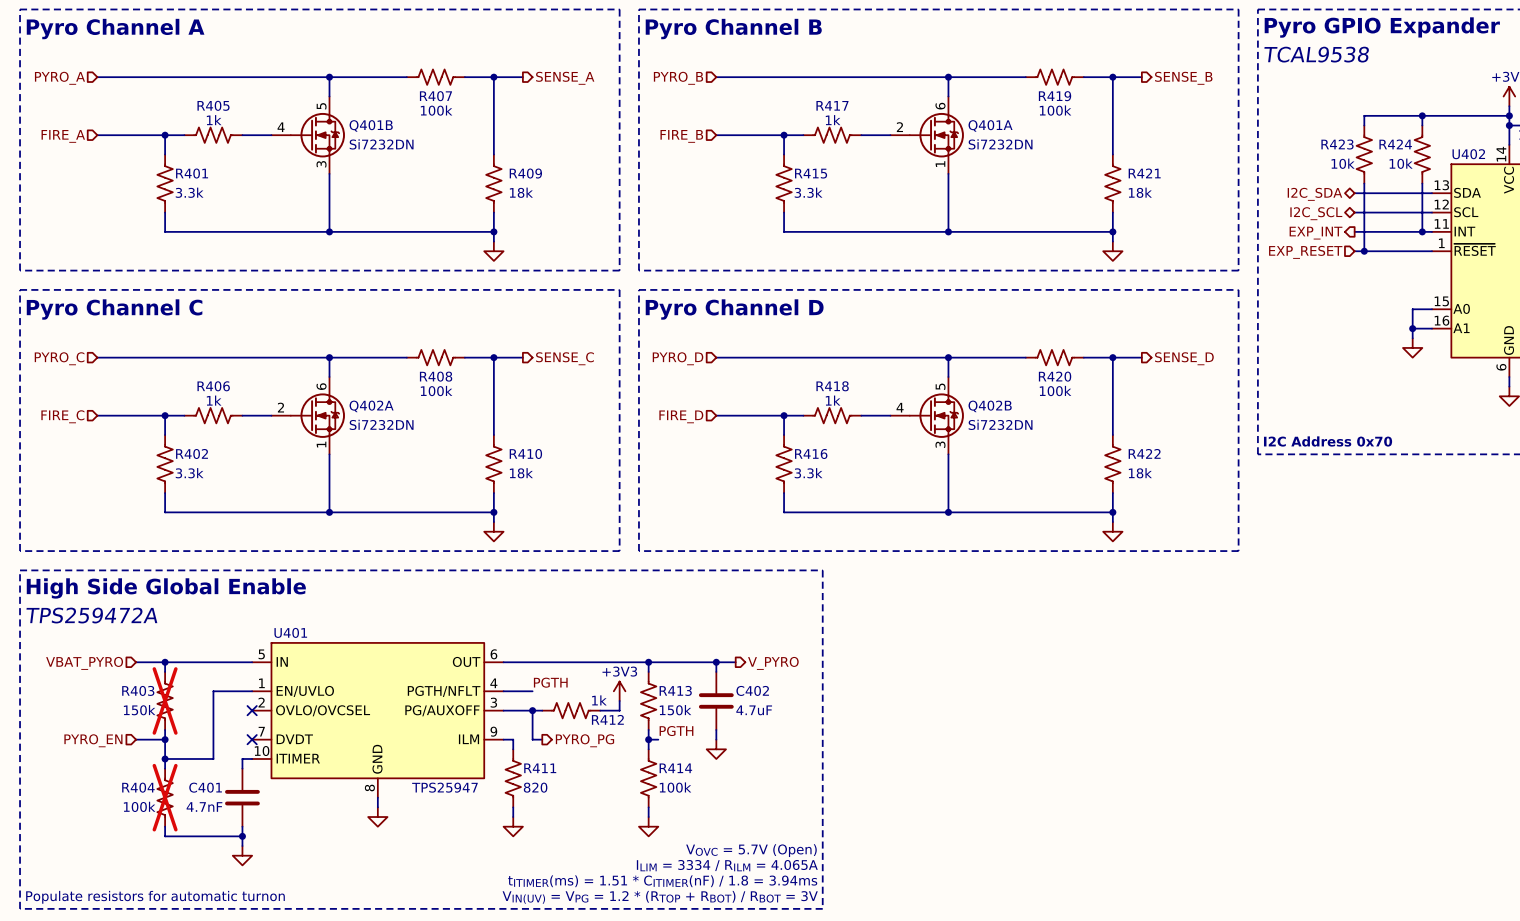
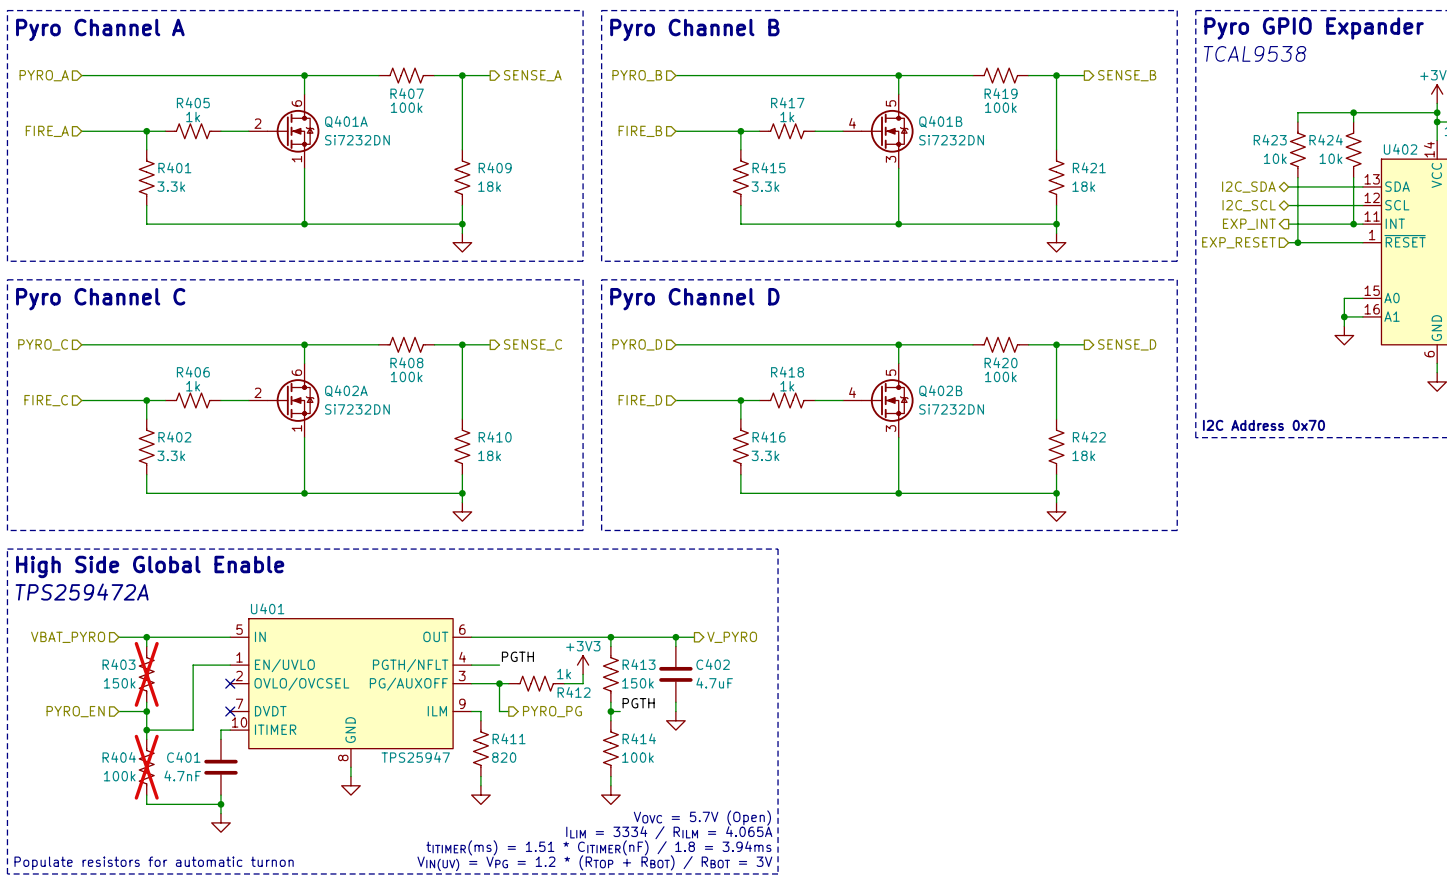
Q401B position: (308, 135) -> (878, 131)
Q401A position: (927, 135) -> (284, 131)

